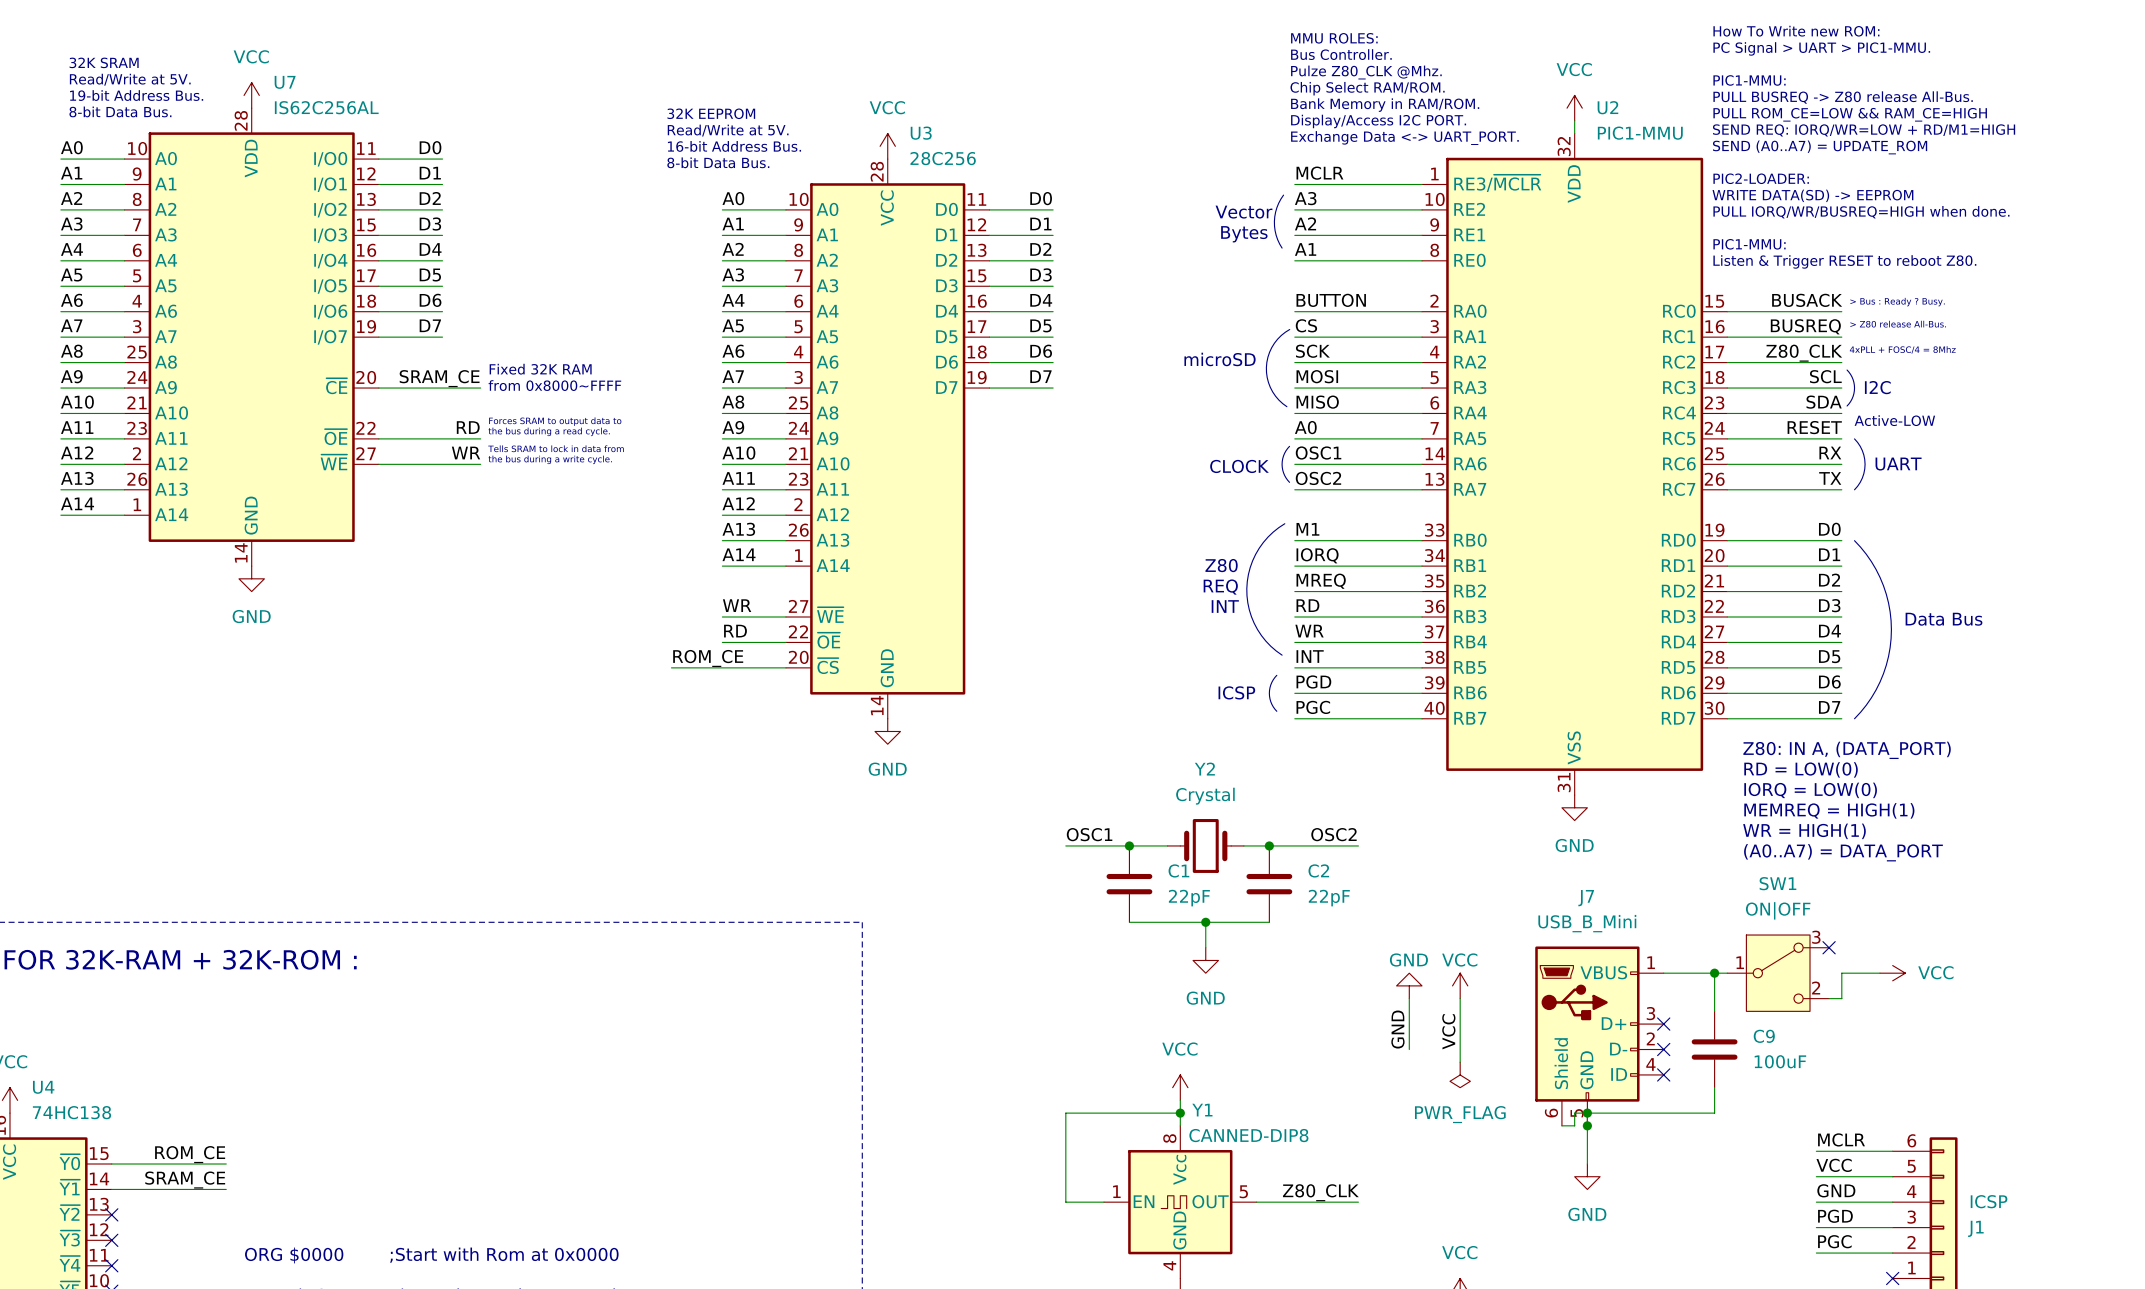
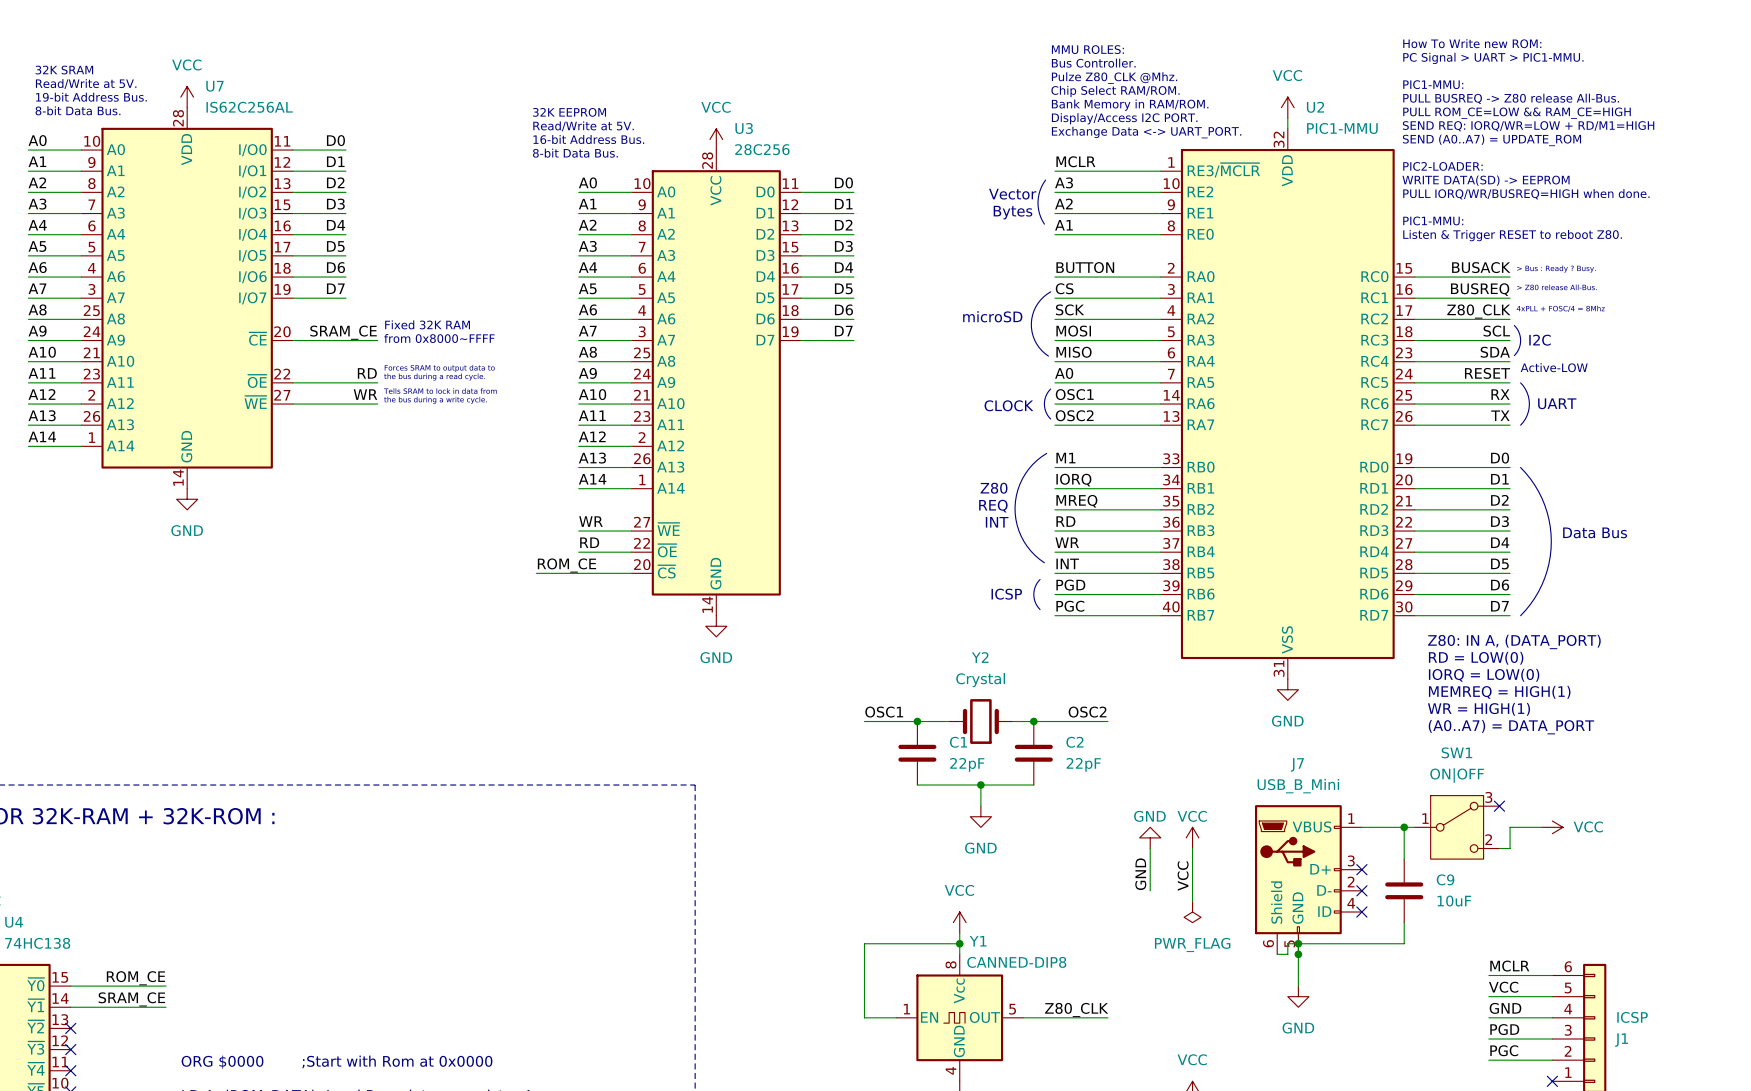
C9 value: 100uF (1780, 1061) -> 10uF (1454, 901)

